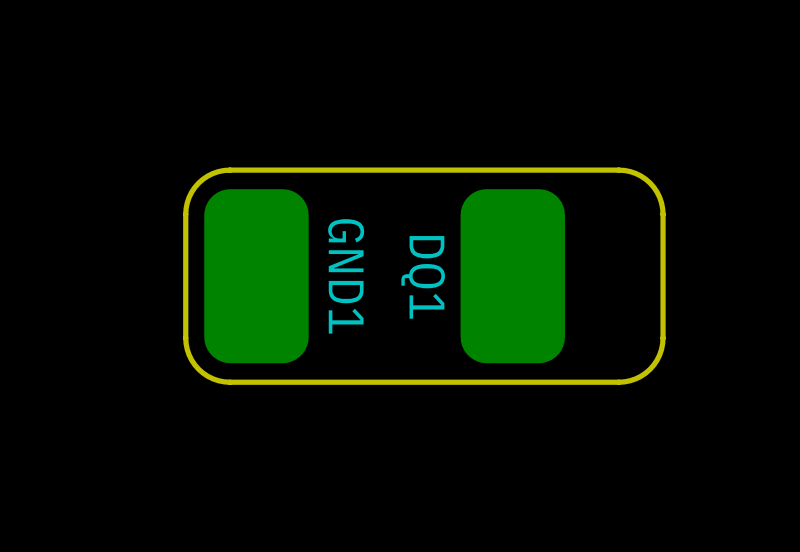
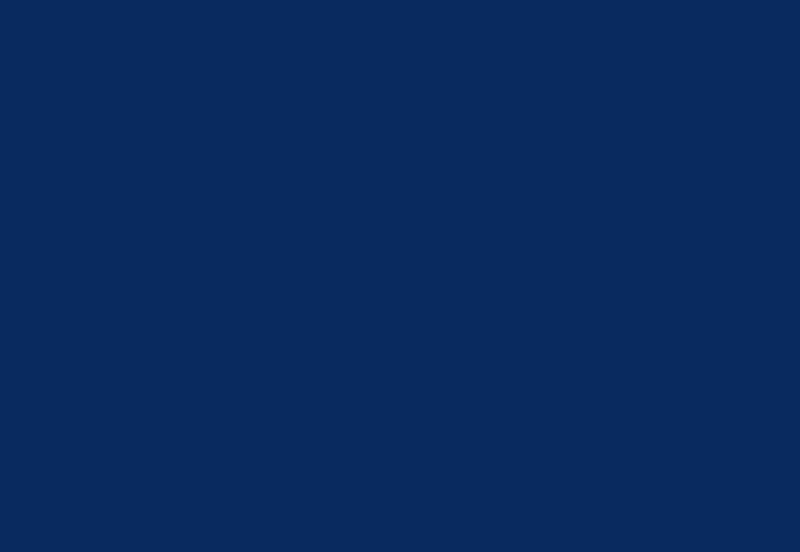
board edge: (618, 170) (229, 170) (213, 173) (203, 179) (194, 187) (189, 197) (186, 208) (185, 338) (189, 354) (194, 364) (207, 376) (218, 380) (229, 382) (618, 382) (635, 378) (645, 373) (653, 364) (659, 354) (662, 343) (662, 208) (657, 192) (645, 179) (630, 171) (618, 170) -> none
GND1: (256, 276) -> none
DQ1: (512, 276) -> none

